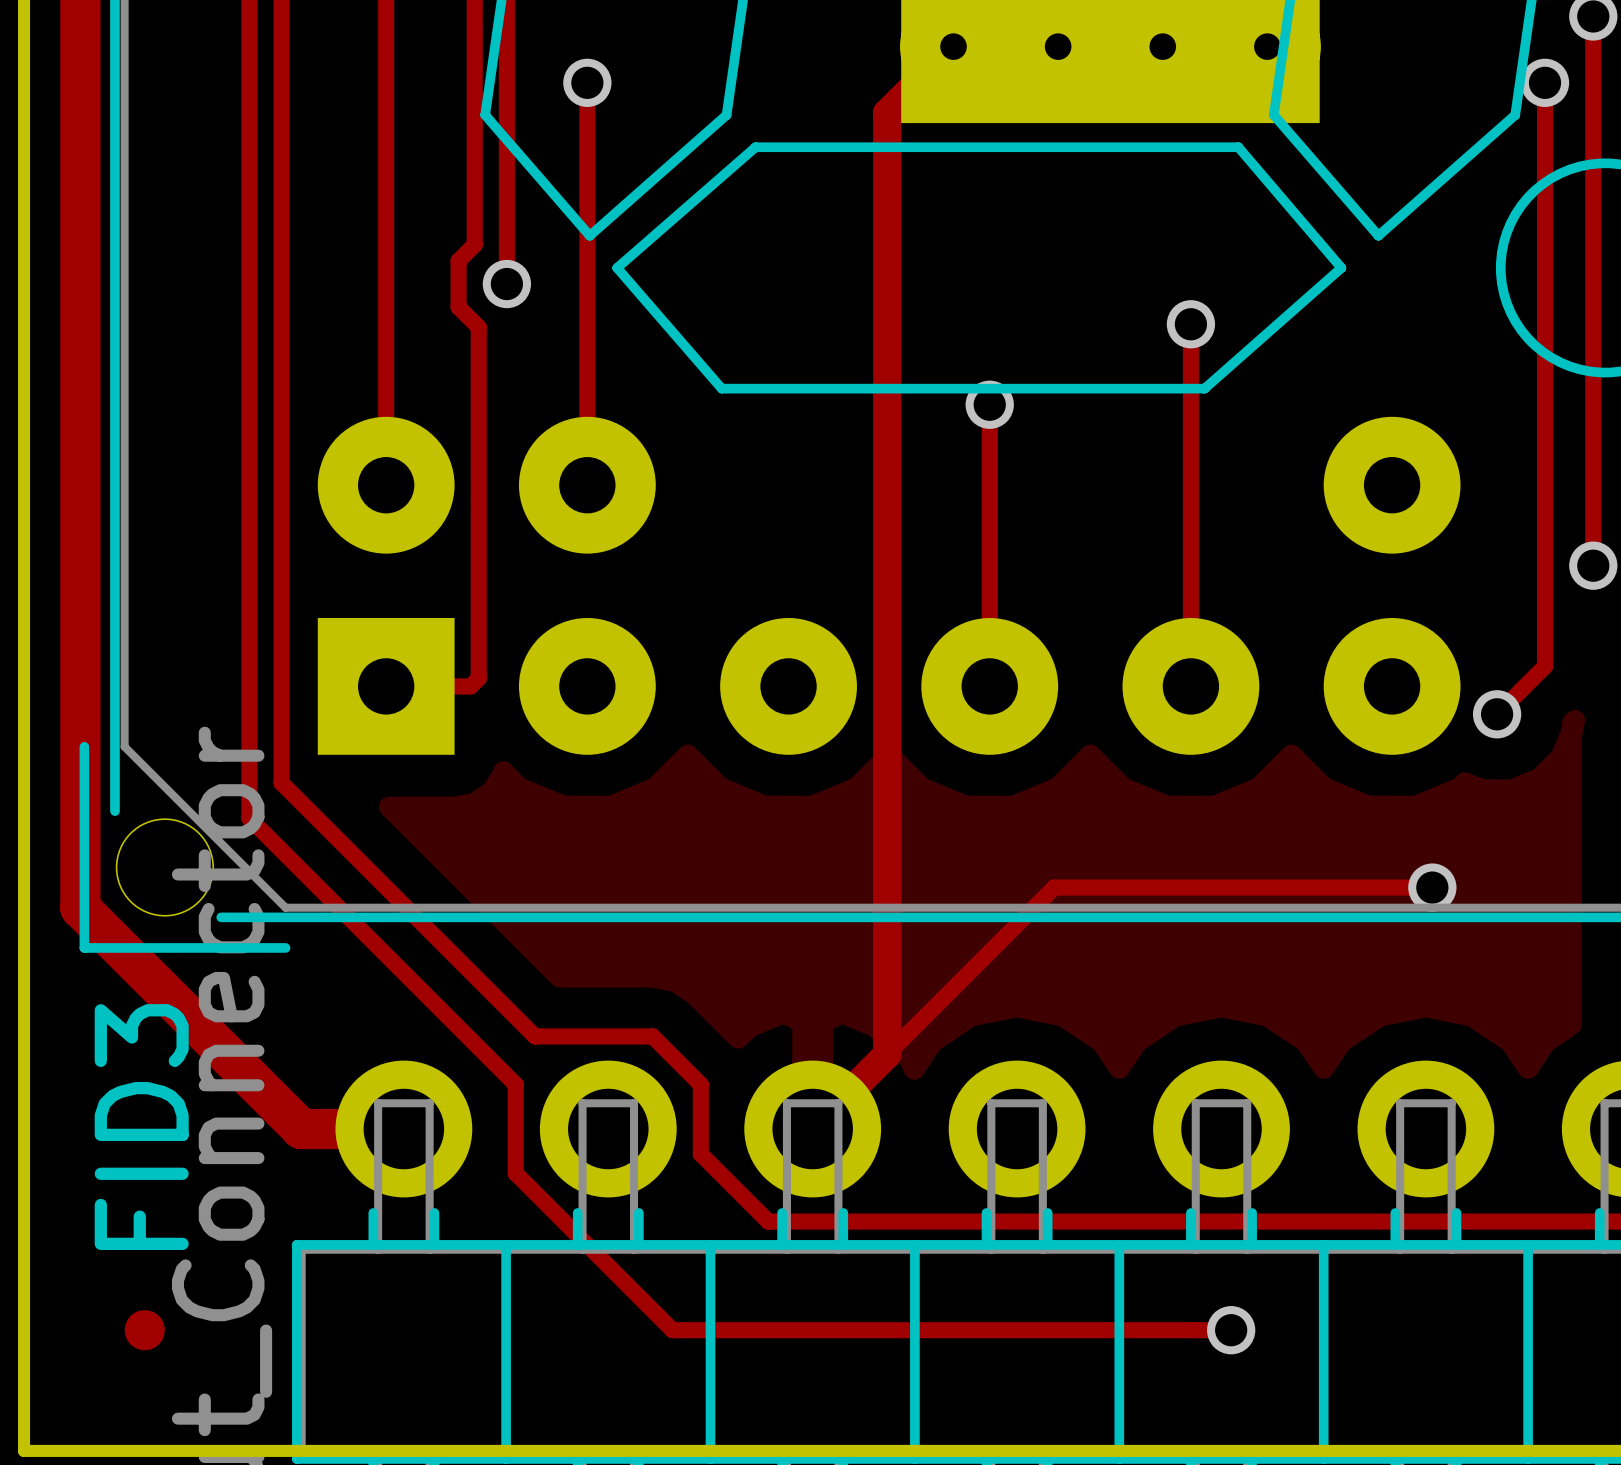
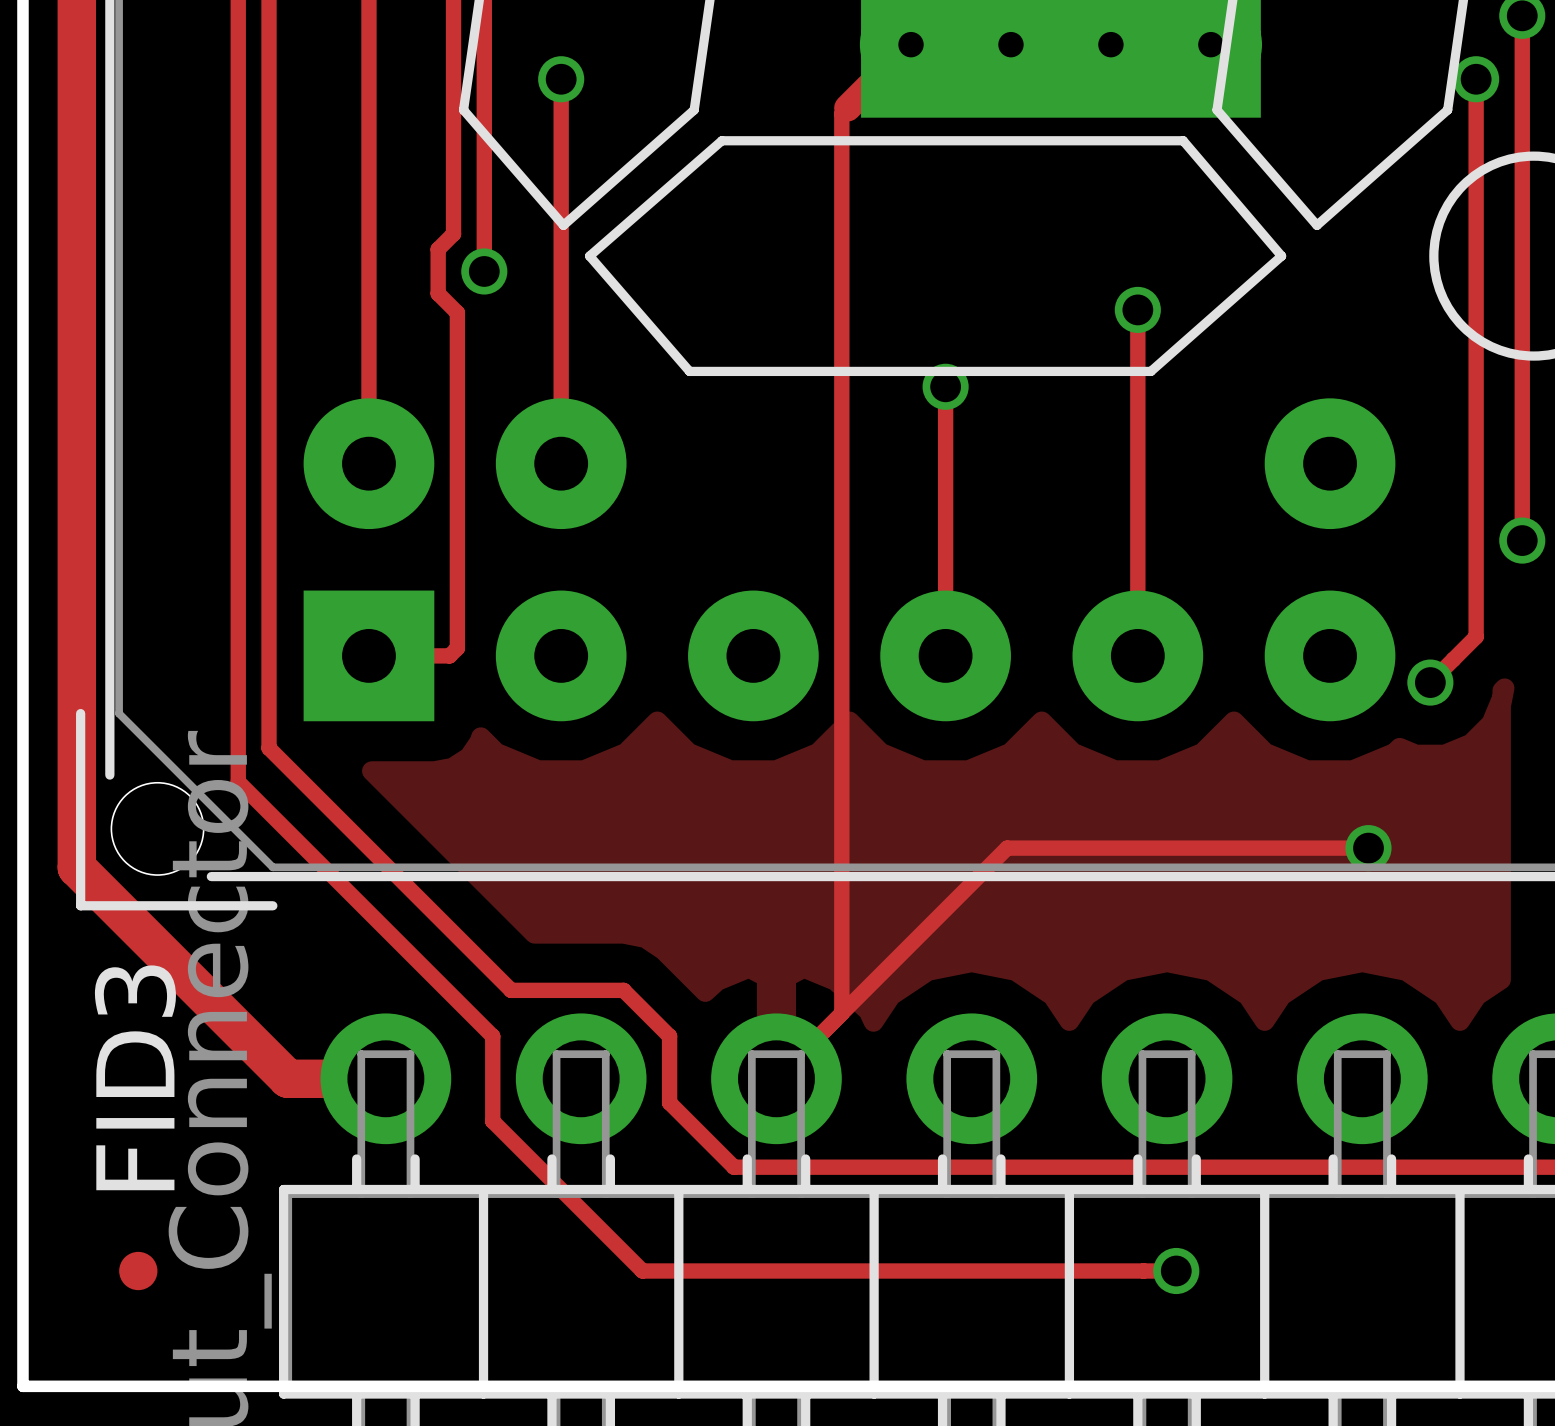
track: (887, 113) (887, 1054) (812, 1129) -> (847, 108) (841, 113) (841, 1013)

